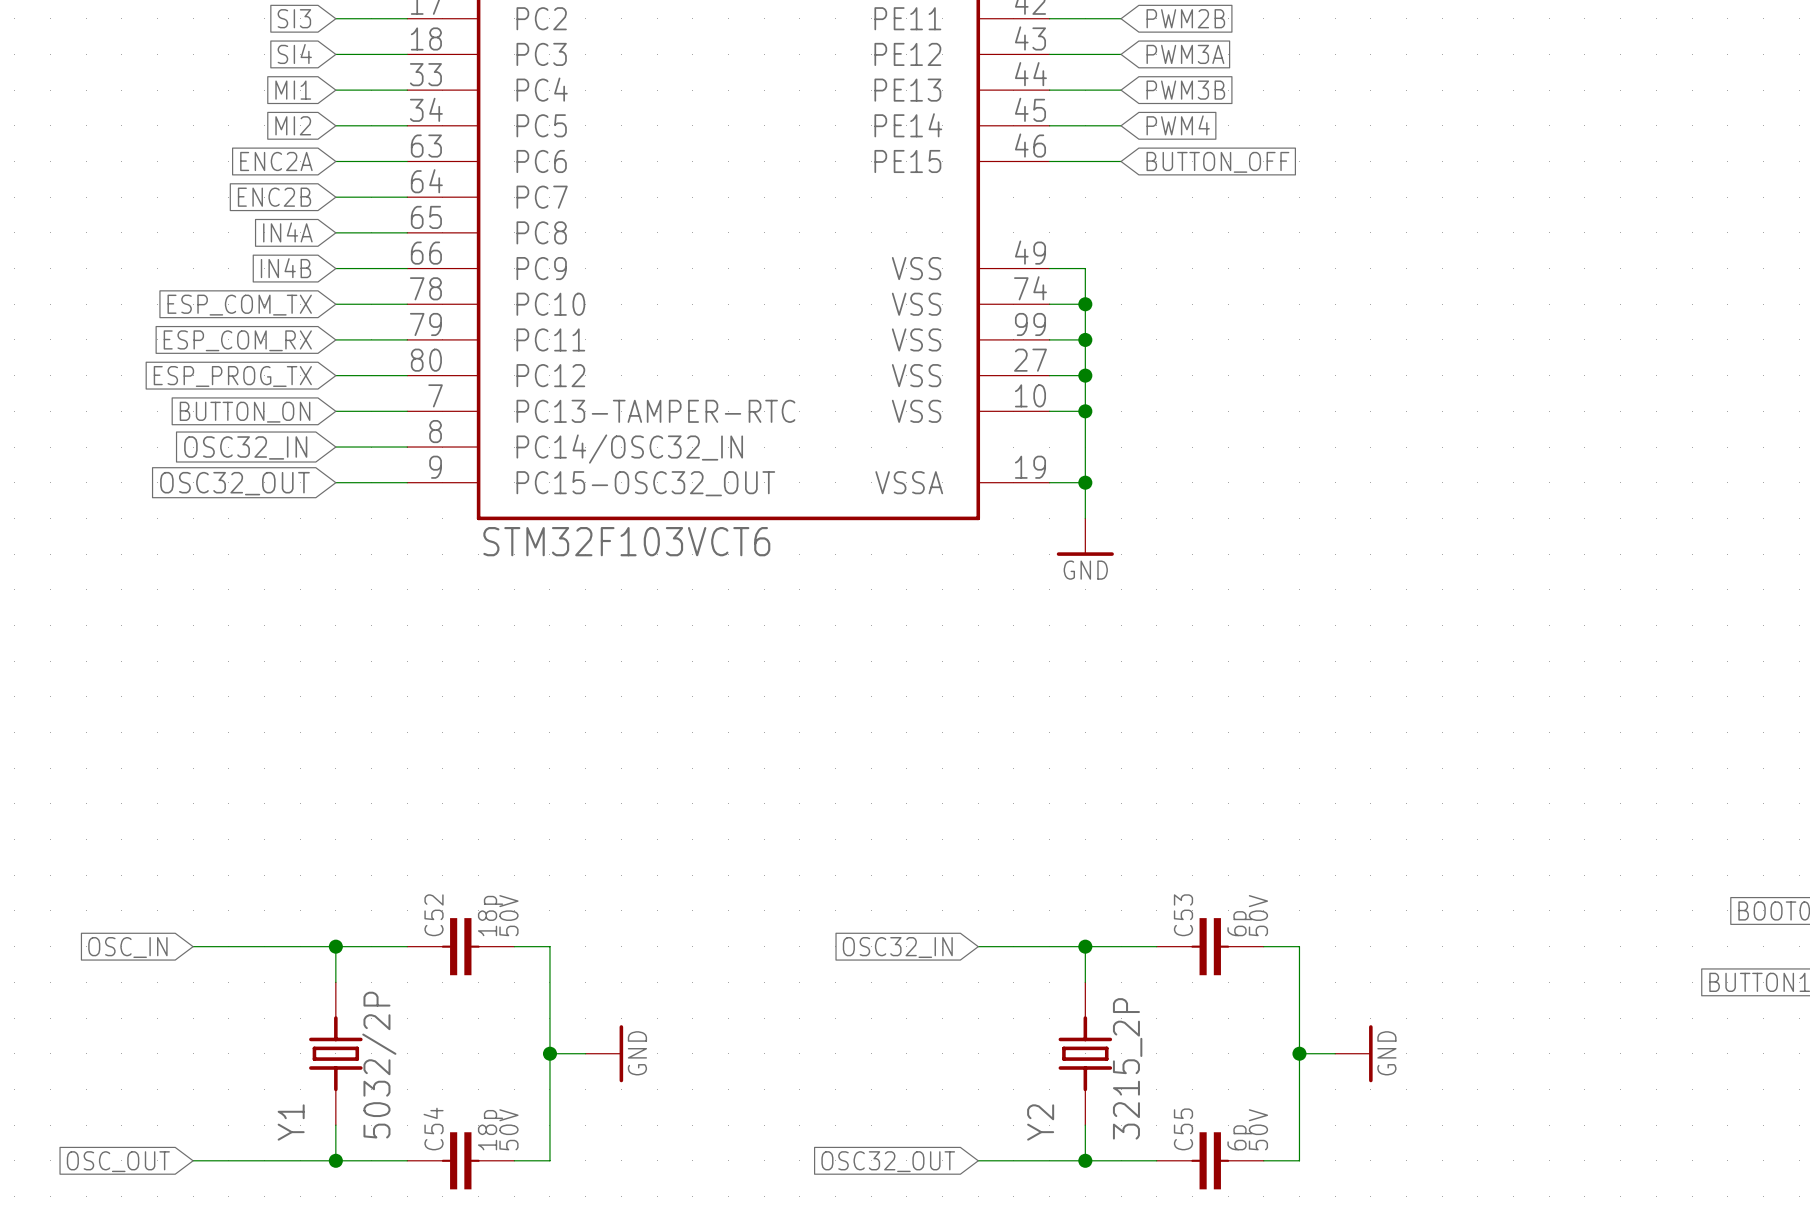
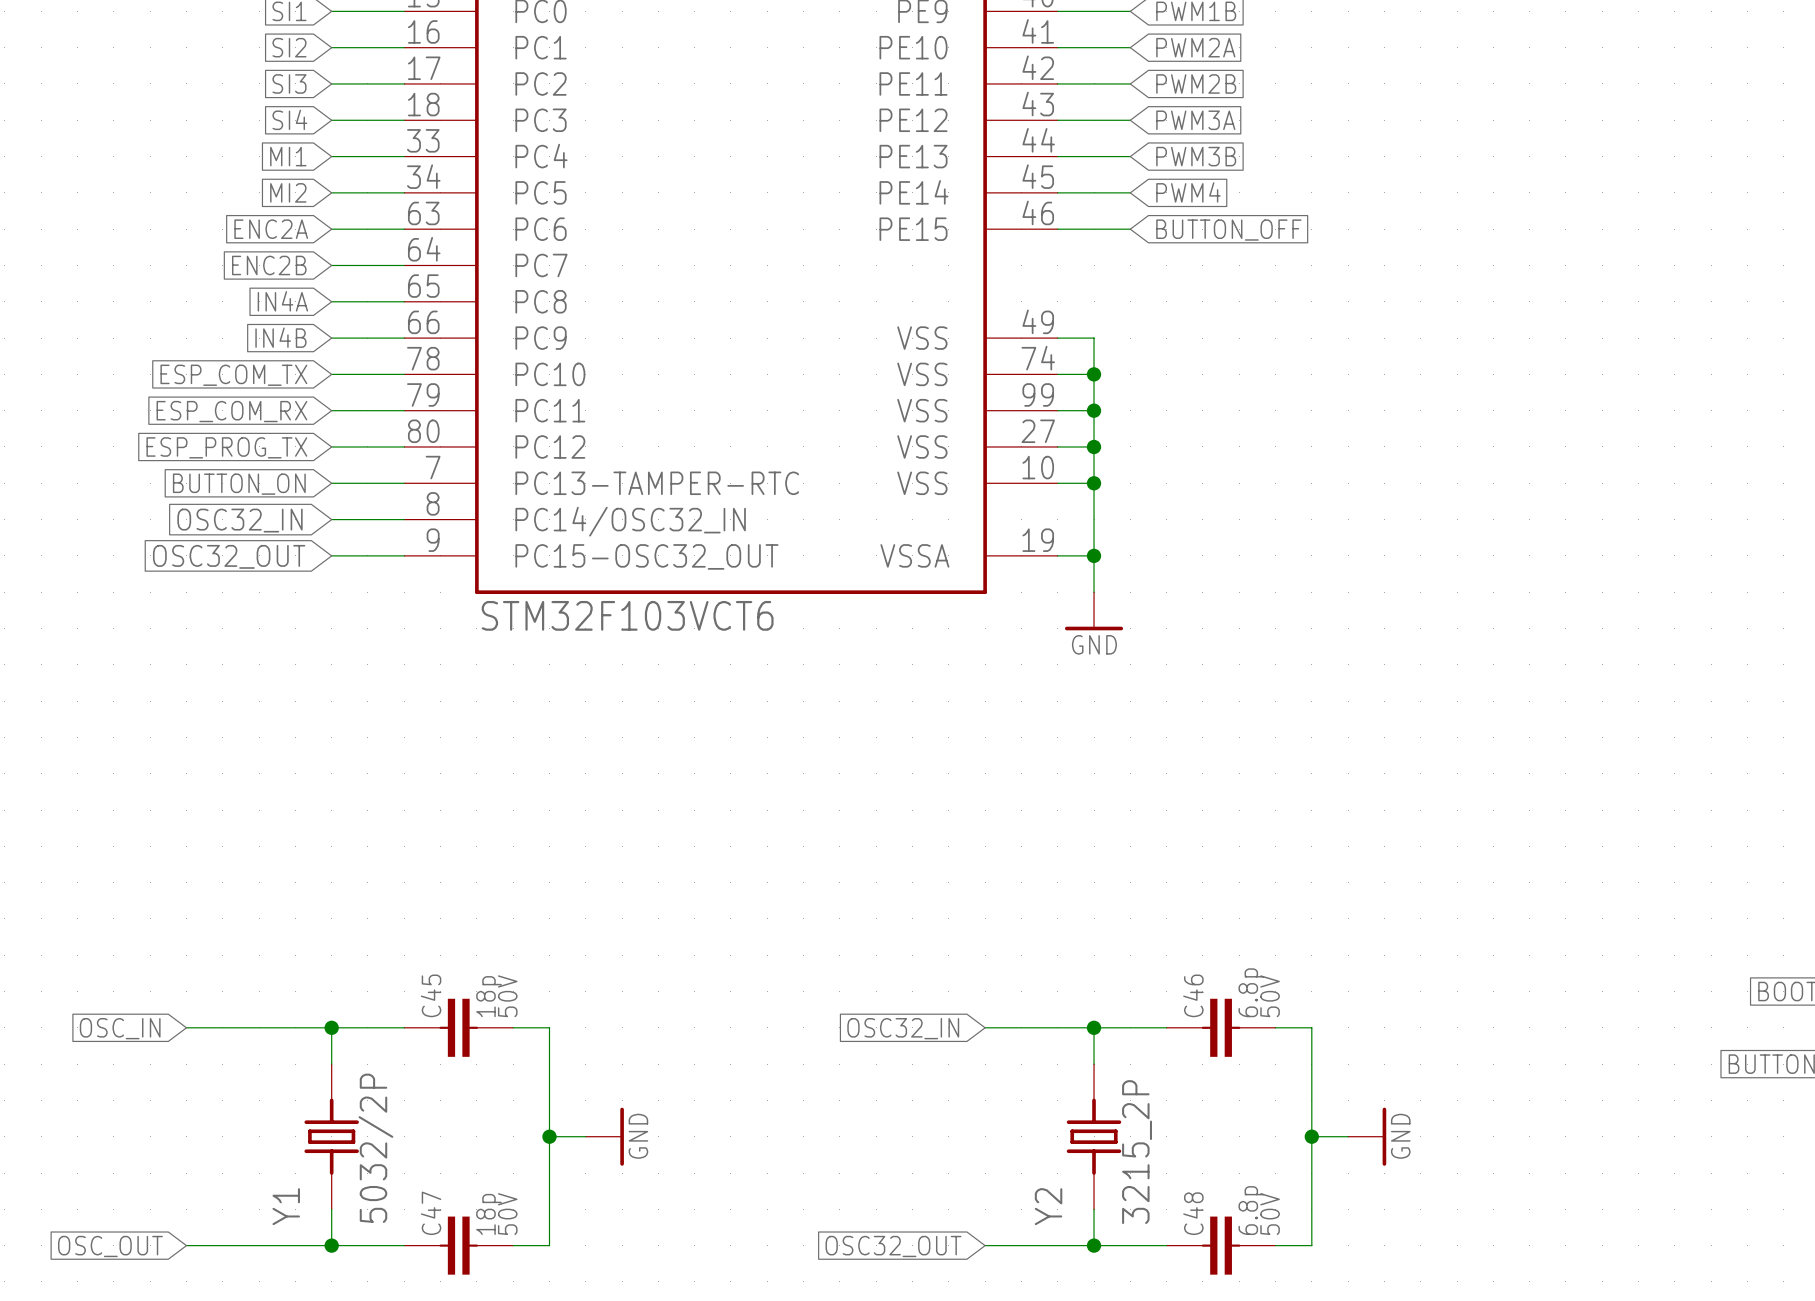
C52 name: C52 (434, 915) -> C45 (431, 995)
C53 name: C53 (1183, 915) -> C46 (1193, 995)
C53 value: 6p (1239, 923) -> 6.8p (1251, 992)
C54 name: C54 (433, 1129) -> C47 (431, 1213)
C55 name: C55 (1183, 1129) -> C48 (1193, 1213)
C55 value: 6p (1239, 1137) -> 6.8p (1251, 1210)

